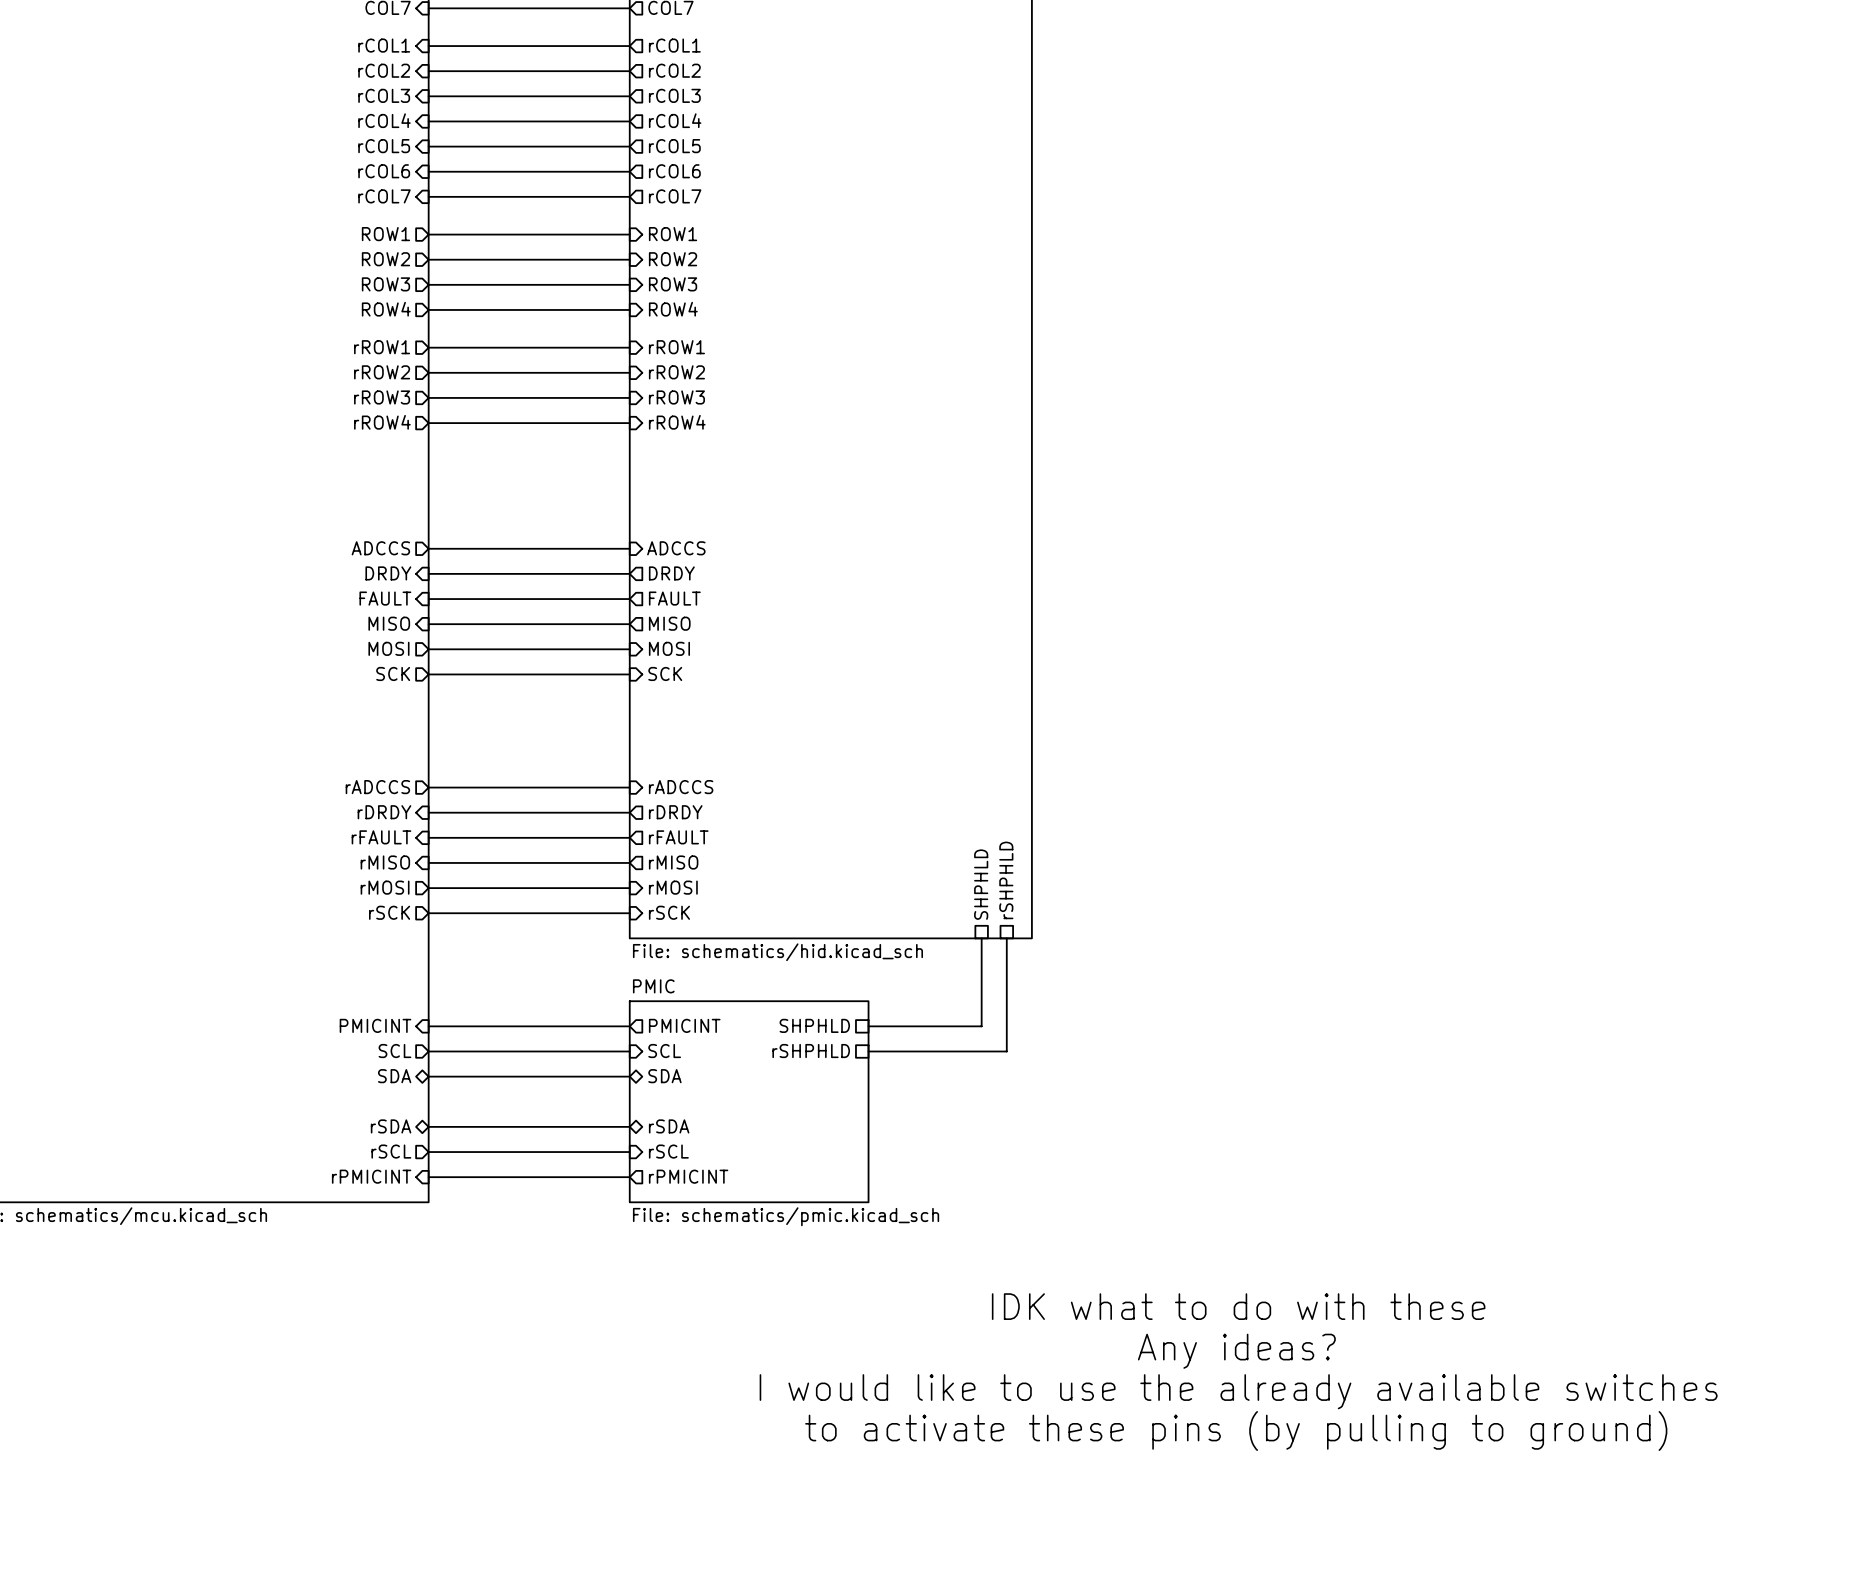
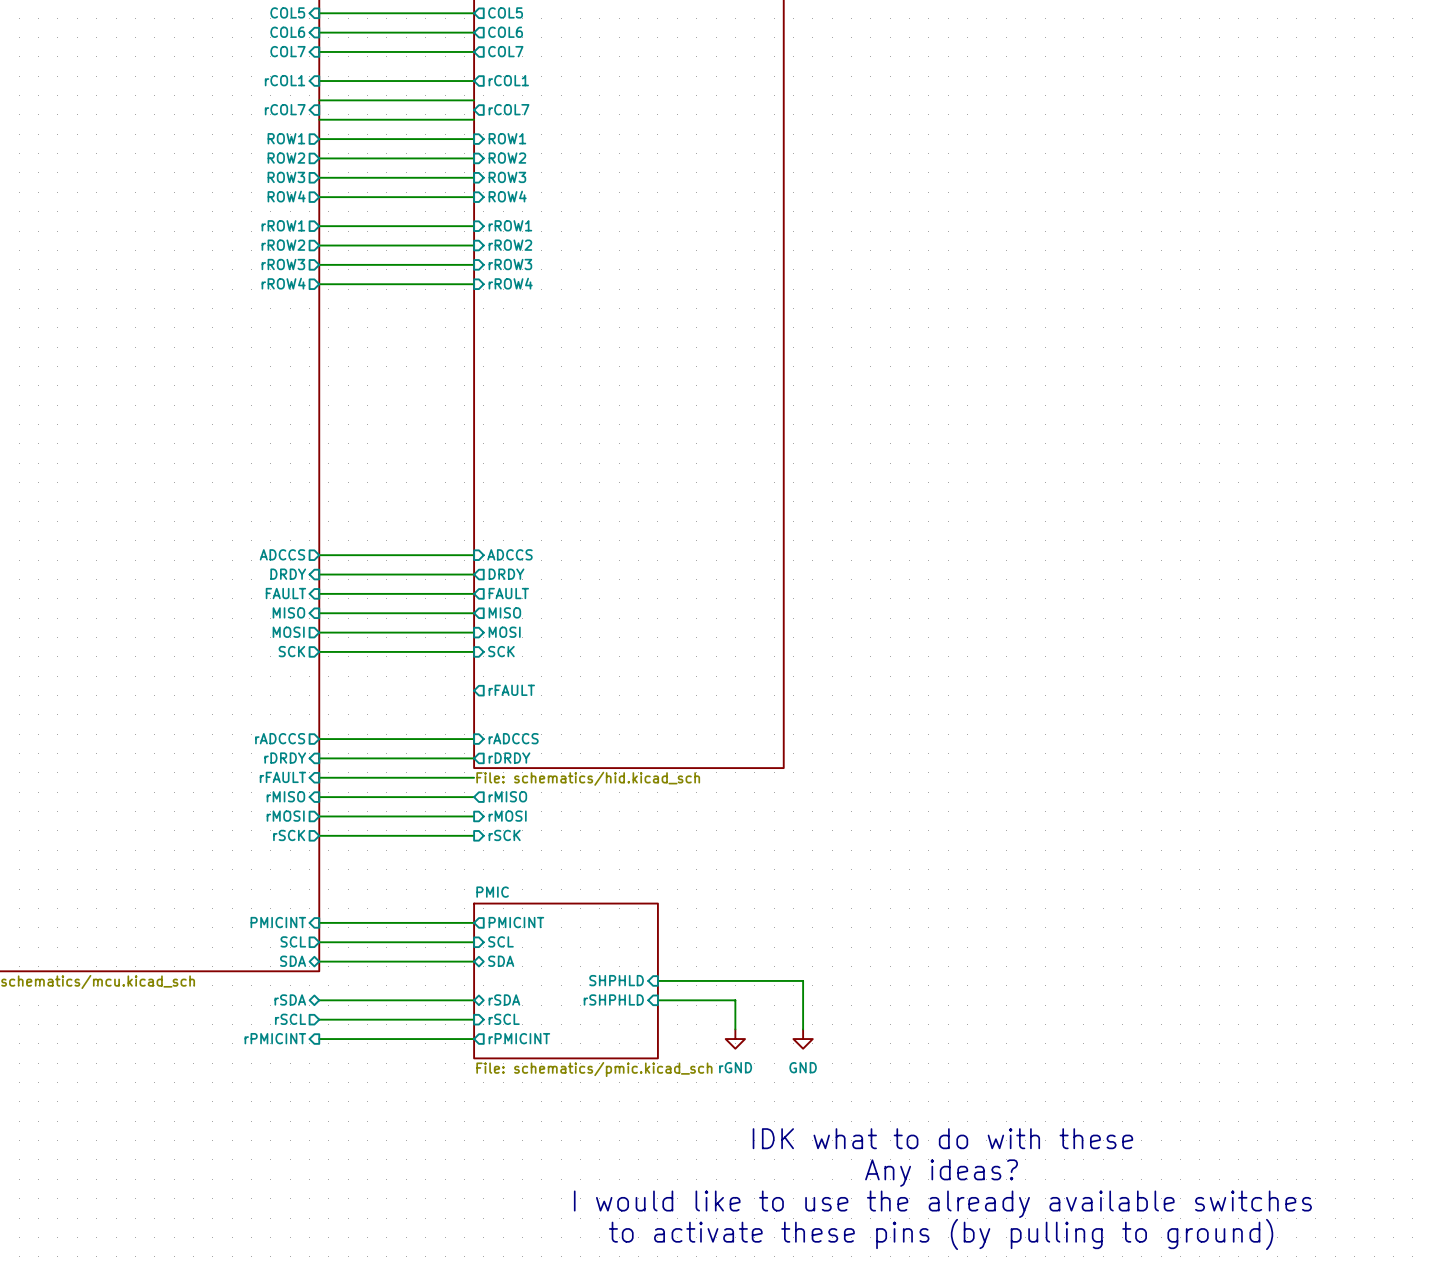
sheet pin: rCOL2 (384, 70) -> none
sheet pin: rCOL2 (674, 70) -> none
sheet pin: none -> rCOL7 (285, 109)
sheet pin: none -> rCOL7 (509, 109)
sheet pin: rCOL3 (384, 95) -> none
sheet pin: rCOL3 (674, 95) -> none
sheet pin shape: input (384, 120) -> output (286, 138)
sheet pin: rCOL4 (384, 120) -> ROW1 (286, 138)
sheet pin shape: output (675, 120) -> input (507, 138)
sheet pin: rCOL4 (675, 120) -> ROW1 (507, 138)
sheet pin shape: input (384, 146) -> output (286, 158)
sheet pin: rCOL5 (384, 146) -> ROW2 (286, 158)
sheet pin shape: output (674, 146) -> input (507, 158)
sheet pin: rCOL5 (674, 146) -> ROW2 (507, 158)
sheet pin shape: input (384, 171) -> output (286, 177)
sheet pin: rCOL6 (384, 171) -> ROW3 (286, 177)
sheet pin shape: output (674, 171) -> input (507, 177)
sheet pin: rCOL6 (674, 171) -> ROW3 (507, 177)
sheet pin shape: input (384, 196) -> output (286, 196)
sheet pin: rCOL7 (384, 196) -> ROW4 (286, 196)
sheet pin shape: output (675, 196) -> input (507, 196)
sheet pin: rCOL7 (675, 196) -> ROW4 (507, 196)
sheet pin: ROW1 (385, 234) -> rROW1 (283, 225)
sheet pin: ROW1 (673, 234) -> rROW1 (510, 225)
sheet pin: ROW2 (385, 259) -> rROW2 (283, 245)
sheet pin: ROW2 (673, 259) -> rROW2 (510, 245)
sheet pin: ROW3 (385, 284) -> rROW3 (283, 264)
sheet pin: ROW3 (673, 284) -> rROW3 (510, 264)
sheet pin: ROW4 (386, 309) -> rROW4 (283, 283)
sheet pin: ROW4 (673, 309) -> rROW4 (510, 283)
sheet pin: rROW1 (382, 347) -> none
wire: (428, 347) (629, 347) -> none
sheet pin: rROW1 (676, 347) -> none
sheet pin: rROW2 (382, 372) -> none
wire: (428, 372) (629, 372) -> none
sheet pin: rROW2 (676, 372) -> none
sheet pin: rROW3 (382, 397) -> none
wire: (428, 397) (629, 397) -> none
sheet pin: rROW3 (676, 397) -> none
sheet pin: rROW4 (382, 422) -> none
sheet pin: rROW4 (677, 422) -> none
wire: (428, 423) (629, 423) -> none
sheet pin position: ADCCS (380, 548) -> ADCCS (282, 554)
wire: (428, 548) (629, 548) -> none
sheet pin position: ADCCS (676, 548) -> ADCCS (509, 554)
sheet pin position: DRDY (388, 573) -> DRDY (288, 574)
wire: (428, 573) (629, 573) -> (319, 555) (474, 555)
sheet pin position: DRDY (671, 573) -> DRDY (506, 574)
sheet pin position: FAULT (385, 598) -> FAULT (285, 593)
sheet pin position: FAULT (674, 598) -> FAULT (508, 593)
wire: (428, 599) (629, 599) -> (319, 574) (474, 574)
sheet pin position: MISO (389, 623) -> MISO (288, 612)
sheet pin position: MISO (669, 623) -> MISO (504, 612)
wire: (428, 624) (629, 624) -> (319, 593) (474, 593)
sheet pin position: MOSI (388, 648) -> MOSI (288, 632)
sheet pin position: MOSI (669, 648) -> MOSI (504, 632)
wire: (428, 649) (629, 649) -> (319, 613) (474, 613)
sheet pin: SCK (393, 673) -> none
sheet pin: SCK (665, 673) -> none
wire: (428, 674) (629, 674) -> (319, 632) (474, 632)
sheet pin: rADCCS (377, 787) -> SCK (291, 651)
sheet pin: rADCCS (681, 787) -> SCK (501, 651)
sheet pin position: rDRDY (384, 812) -> rDRDY (285, 758)
wire: (428, 812) (629, 812) -> (319, 739) (474, 739)
sheet pin position: rDRDY (675, 812) -> rDRDY (509, 758)
sheet pin position: rFAULT (381, 837) -> rFAULT (282, 777)
wire: (428, 837) (629, 837) -> (319, 758) (474, 758)
sheet pin position: rMISO (385, 862) -> rMISO (285, 796)
wire: (428, 862) (629, 862) -> (319, 777) (474, 777)
sheet pin position: rMISO (673, 862) -> rMISO (507, 796)
sheet pin: rSHPHLD (1006, 880) -> none
sheet pin: SHPHLD (981, 884) -> none
sheet pin position: rMOSI (385, 887) -> rMOSI (285, 816)
sheet pin position: rMOSI (673, 887) -> rMOSI (507, 816)
wire: (428, 888) (629, 888) -> (319, 797) (474, 797)
sheet pin: none -> rADCCS (280, 738)
sheet pin: none -> rADCCS (513, 738)
sheet pin: rSCK (389, 912) -> none
sheet pin: rSCK (669, 912) -> none
wire: (428, 913) (629, 913) -> (319, 816) (474, 816)
wire: (981, 938) (981, 1026) (868, 1026) -> none
wire: (1006, 938) (1006, 1051) (868, 1051) -> none
sheet pin shape: input (375, 1025) -> output (289, 835)
sheet pin: PMICINT (375, 1025) -> rSCK (289, 835)
sheet pin shape: output (684, 1025) -> input (504, 835)
sheet pin: PMICINT (684, 1025) -> rSCK (504, 835)
sheet pin: SHPHLD (814, 1025) -> none
sheet pin position: SCL (394, 1051) -> SCL (293, 941)
wire: (428, 1051) (629, 1051) -> (319, 922) (474, 922)
sheet pin position: SCL (664, 1051) -> SCL (500, 941)
sheet pin: rSHPHLD (811, 1051) -> none
sheet pin position: SDA (394, 1076) -> SDA (293, 961)
wire: (428, 1076) (629, 1076) -> (319, 942) (474, 942)
sheet pin position: SDA (664, 1076) -> SDA (501, 961)
sheet PMIC position: (749, 1101) -> (566, 980)
sheet pin position: rSDA (391, 1126) -> rSDA (290, 999)
wire: (428, 1126) (629, 1126) -> (319, 961) (474, 961)
sheet pin position: rSDA (669, 1126) -> rSDA (504, 999)
sheet pin: none -> PMICINT (278, 922)
sheet pin: none -> PMICINT (516, 922)
sheet pin position: rSCL (391, 1151) -> rSCL (290, 1019)
sheet pin position: rSCL (668, 1151) -> rSCL (504, 1019)
wire: (428, 1152) (629, 1152) -> (319, 1000) (474, 1000)
sheet pin position: rPMICINT (371, 1176) -> rPMICINT (275, 1038)
sheet pin position: rPMICINT (688, 1176) -> rPMICINT (519, 1038)
wire: (428, 1177) (629, 1177) -> (319, 1019) (474, 1019)
sheet pin: none -> SHPHLD (616, 980)
wire: none -> (657, 980) (803, 980) (803, 1029)
sheet pin: none -> rSHPHLD (613, 999)
wire: none -> (657, 1000) (735, 1000) (735, 1029)
wire: none -> (319, 1039) (474, 1039)
power symbol: none -> rGND (735, 1039)
power symbol: none -> GND (803, 1039)
text position: IDK what to do with these (1238, 1306) -> IDK what to do with these (942, 1138)
text position: Any ideas? (1236, 1351) -> Any ideas? (941, 1173)
text position: I would like to use the already available switches (1238, 1391) -> I would like to use the already available switches (942, 1204)
text position: to activate these pins (by pulling to ground) (1236, 1431) -> to activate these pins (by pulling to ground) (941, 1234)

